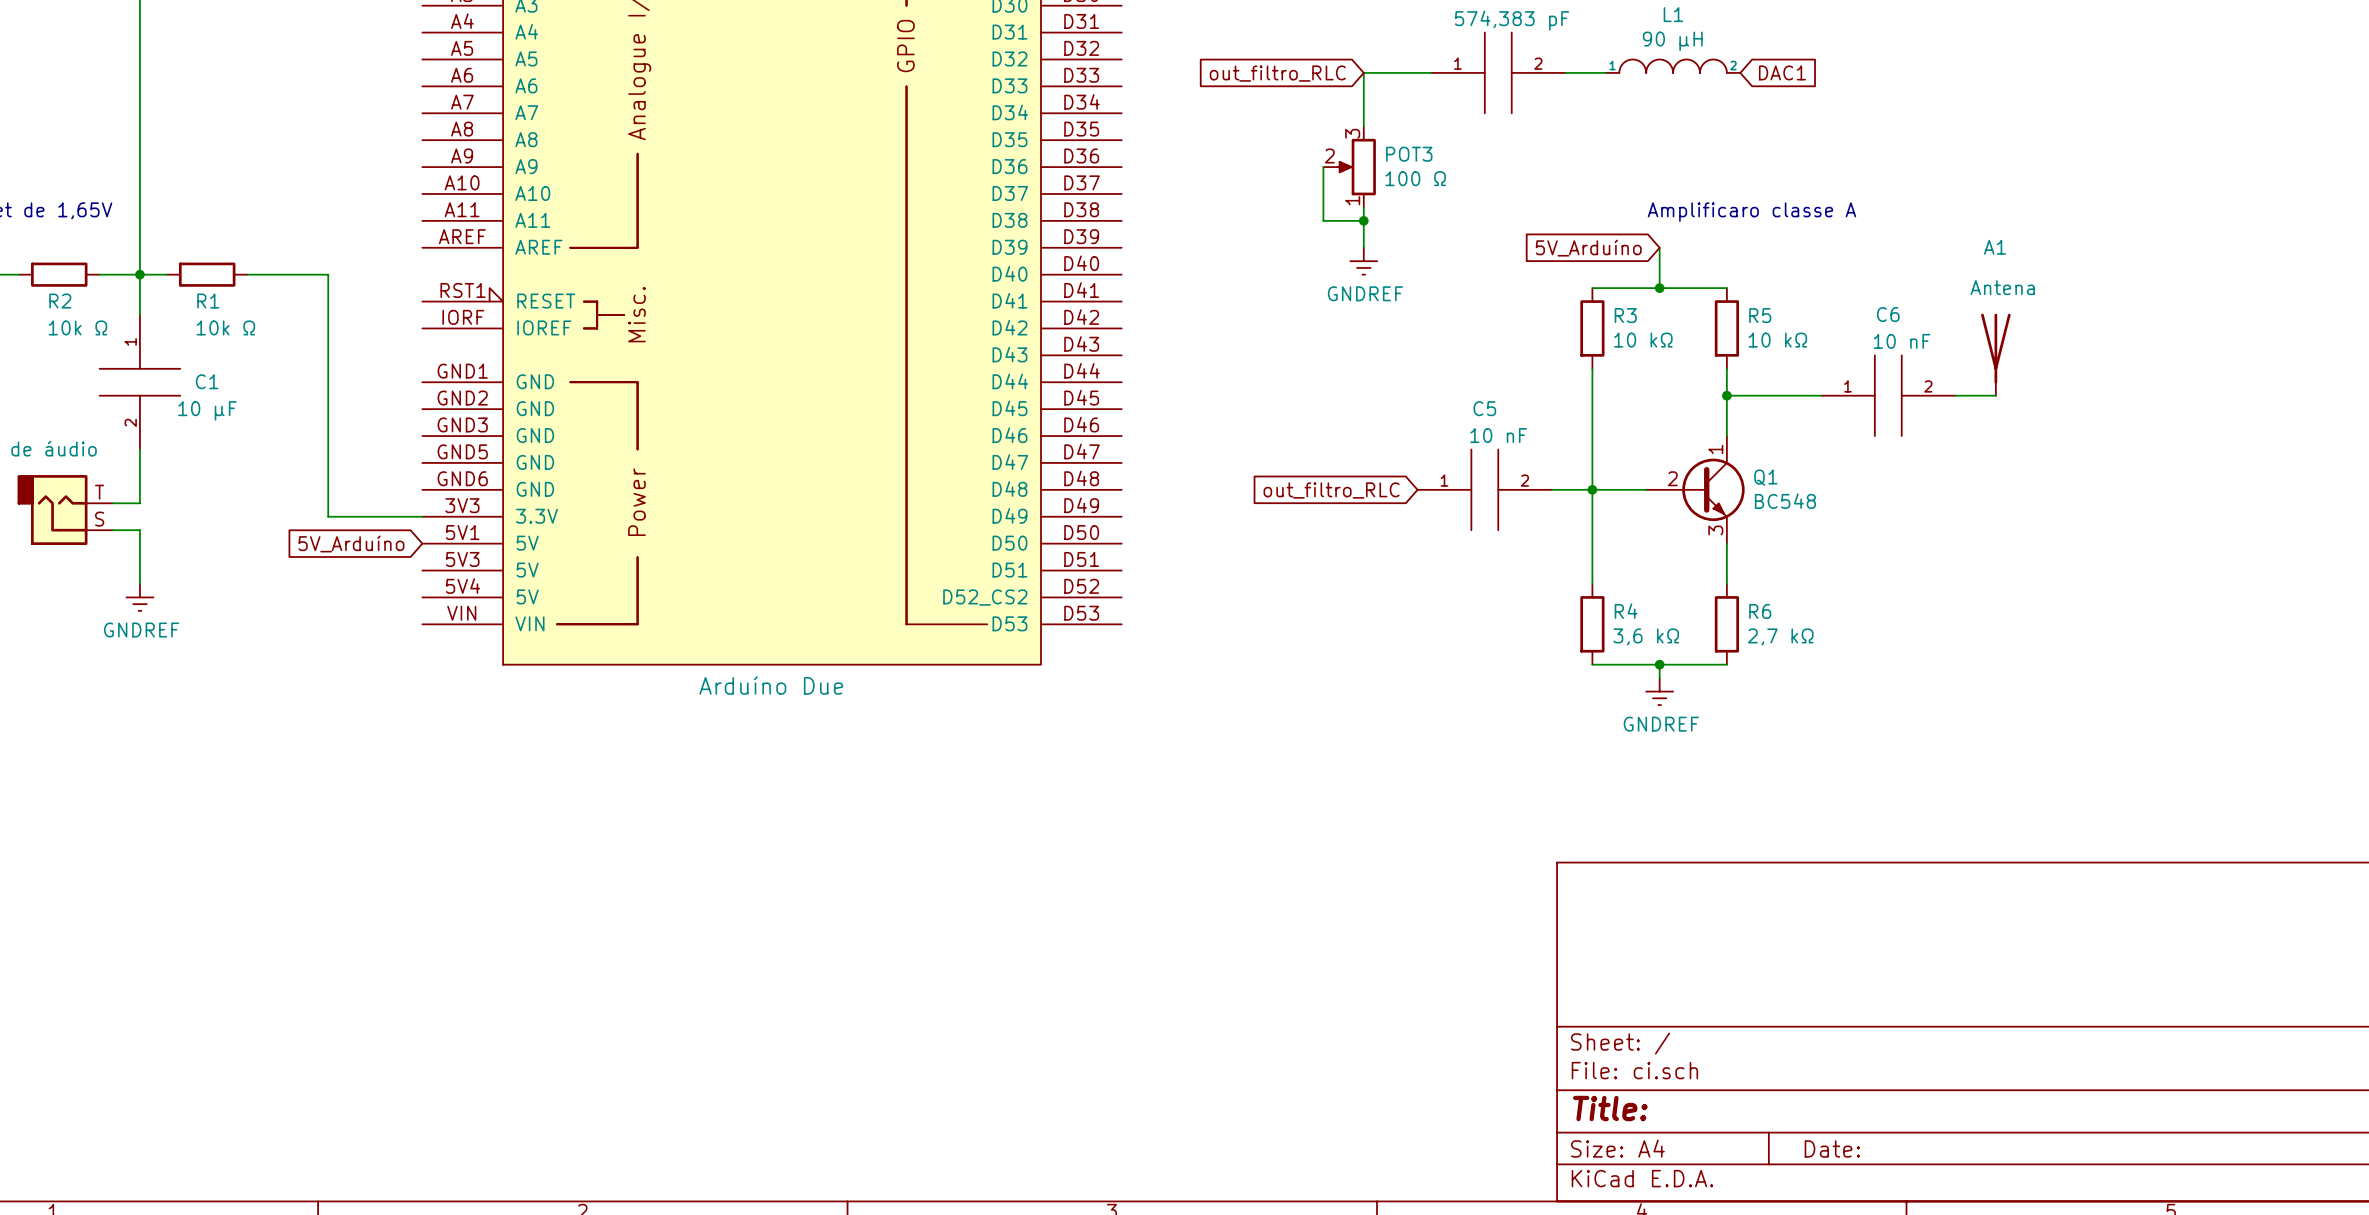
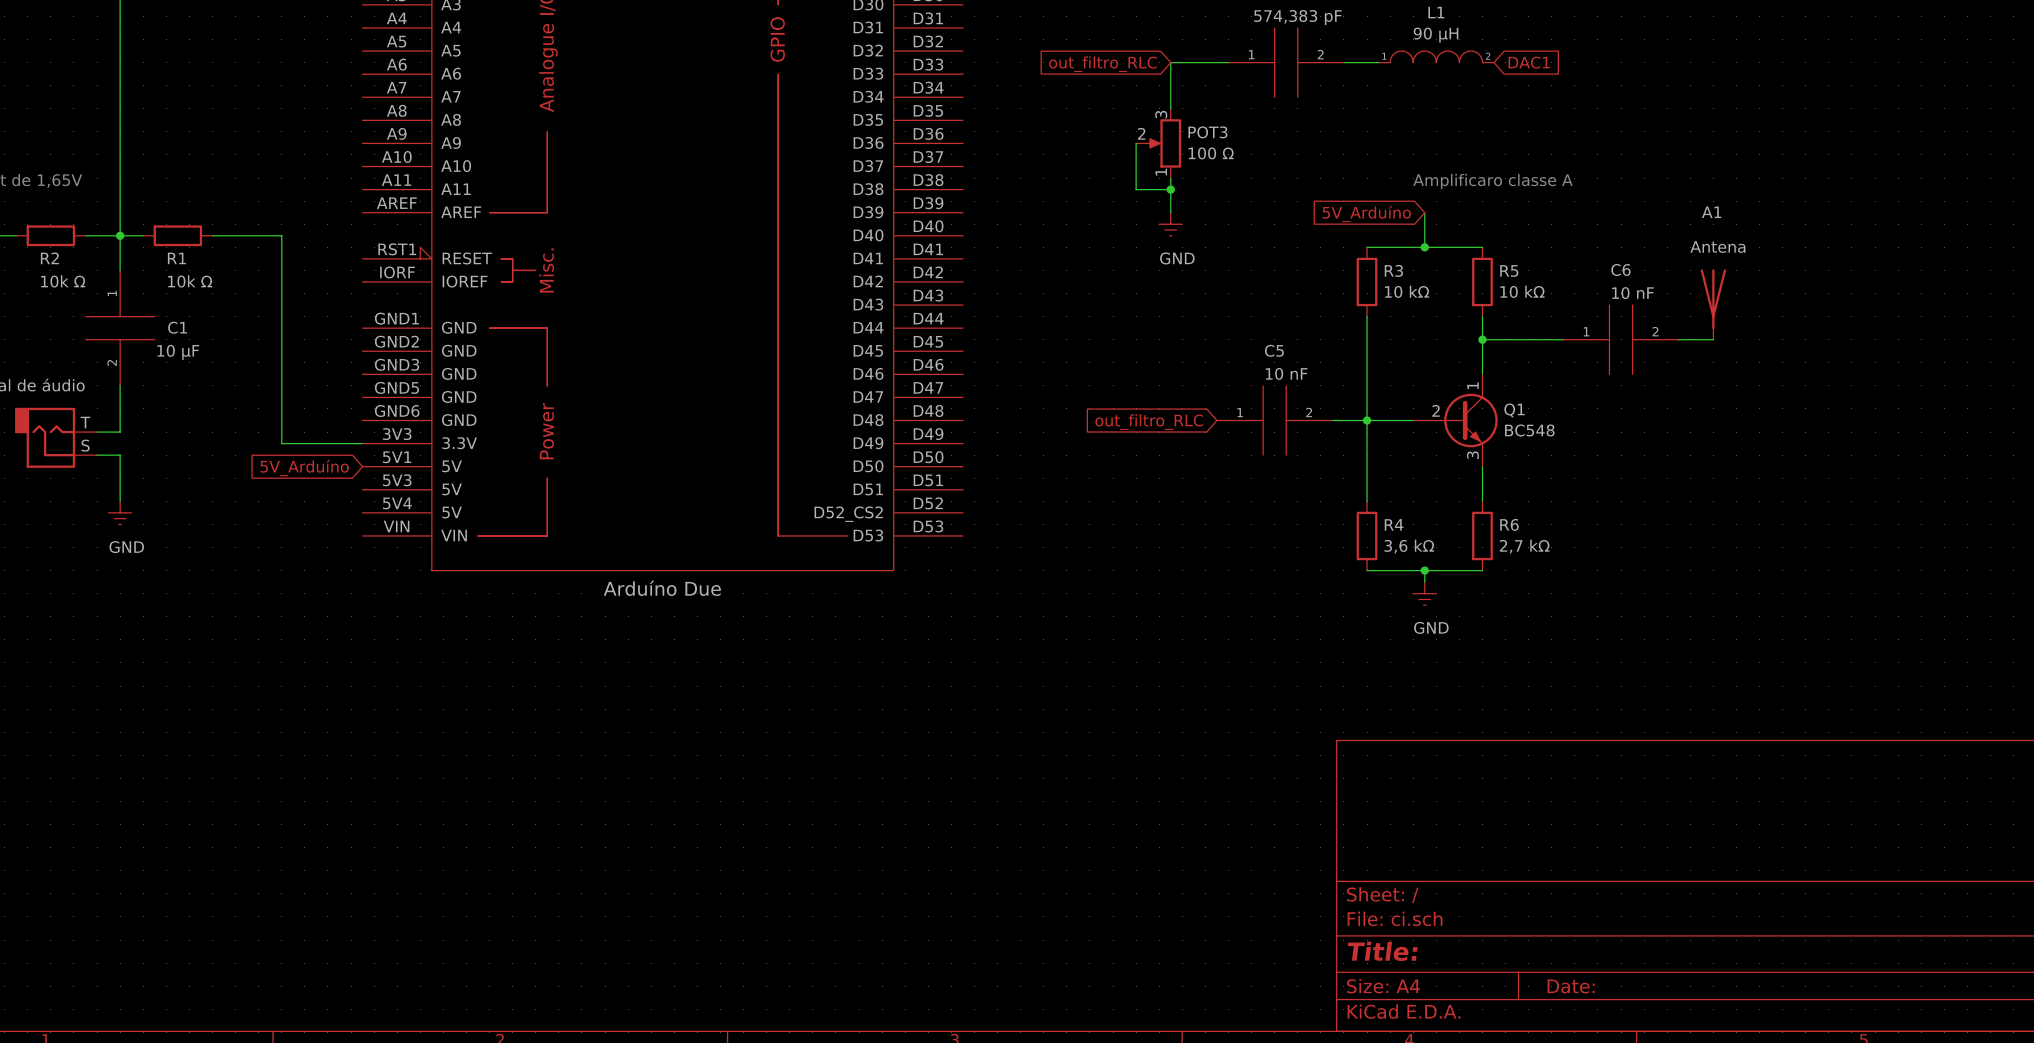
GND text: GNDREF (1365, 293) -> none
GND name: none -> GND (1177, 258)
GND text: GNDREF (141, 630) -> none
GND name: none -> GND (126, 547)
GND text: GNDREF (1661, 724) -> none
GND name: none -> GND (1431, 627)

